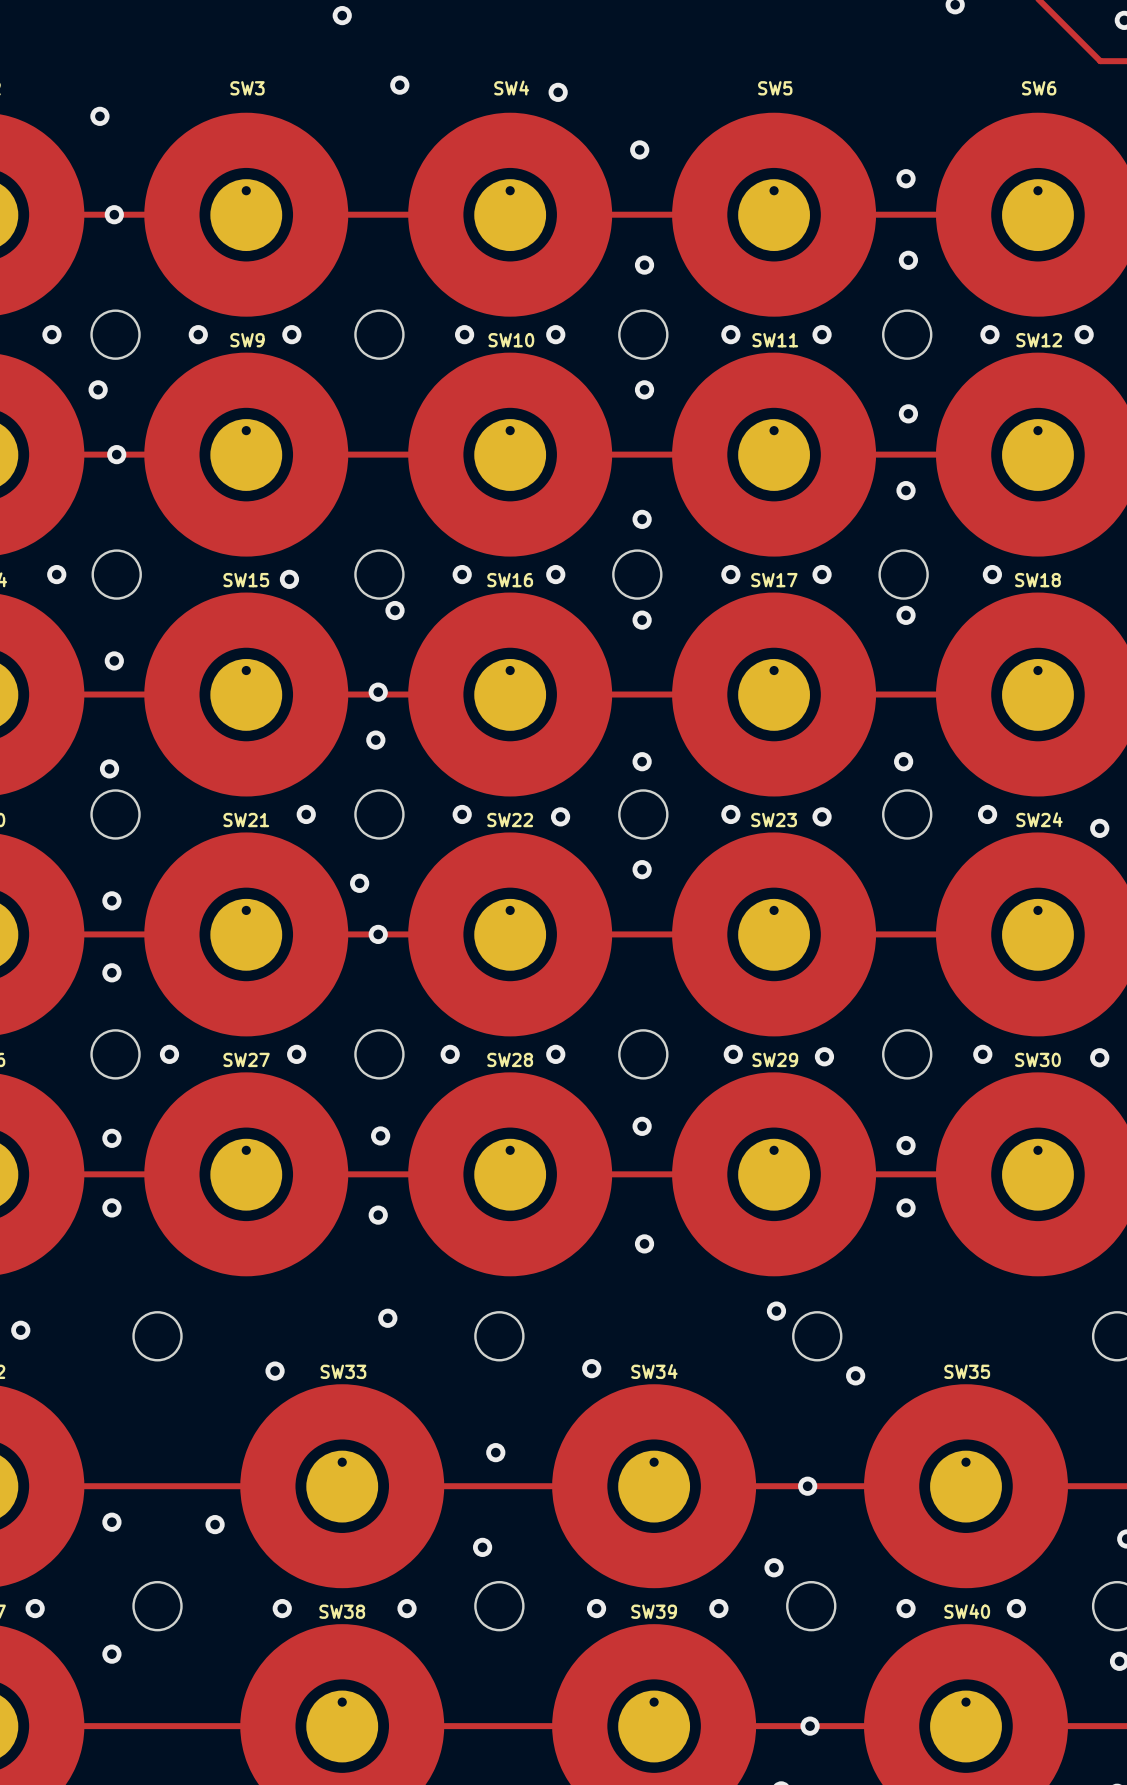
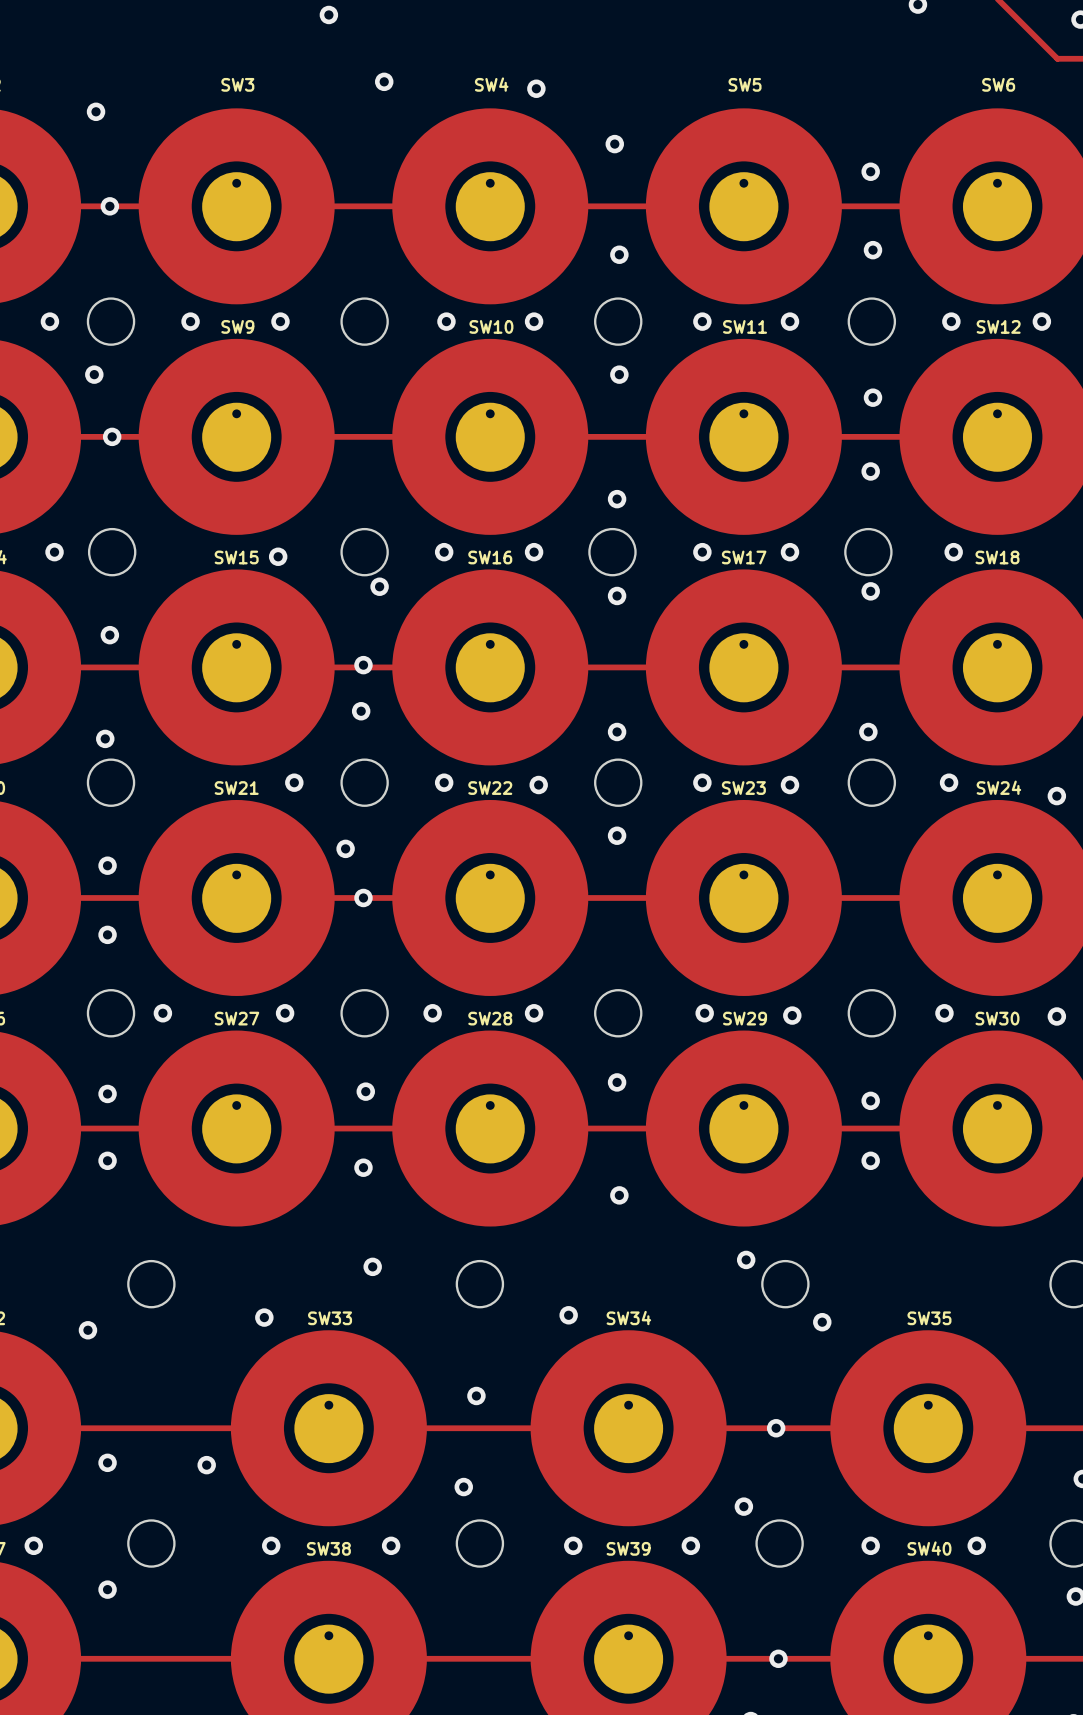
via position: (20, 1330) -> (87, 1330)

